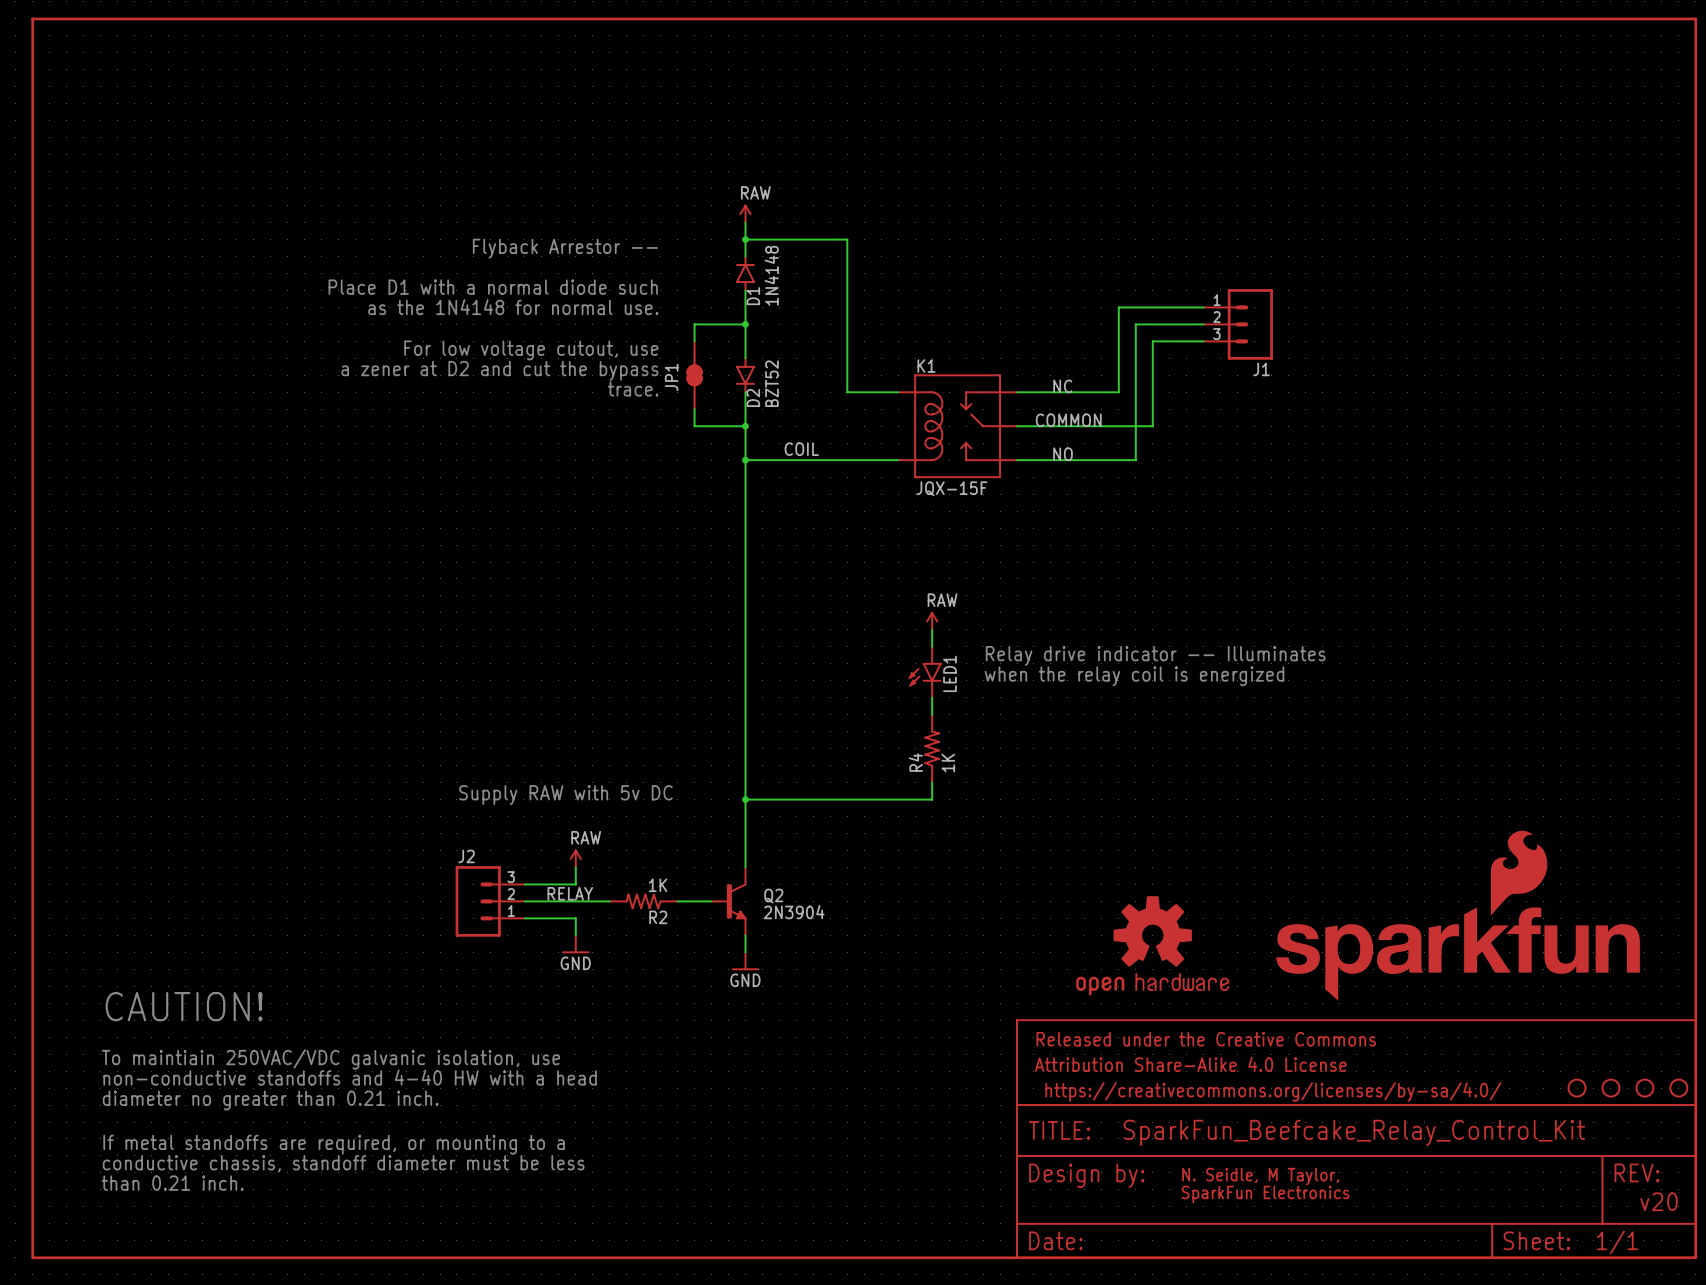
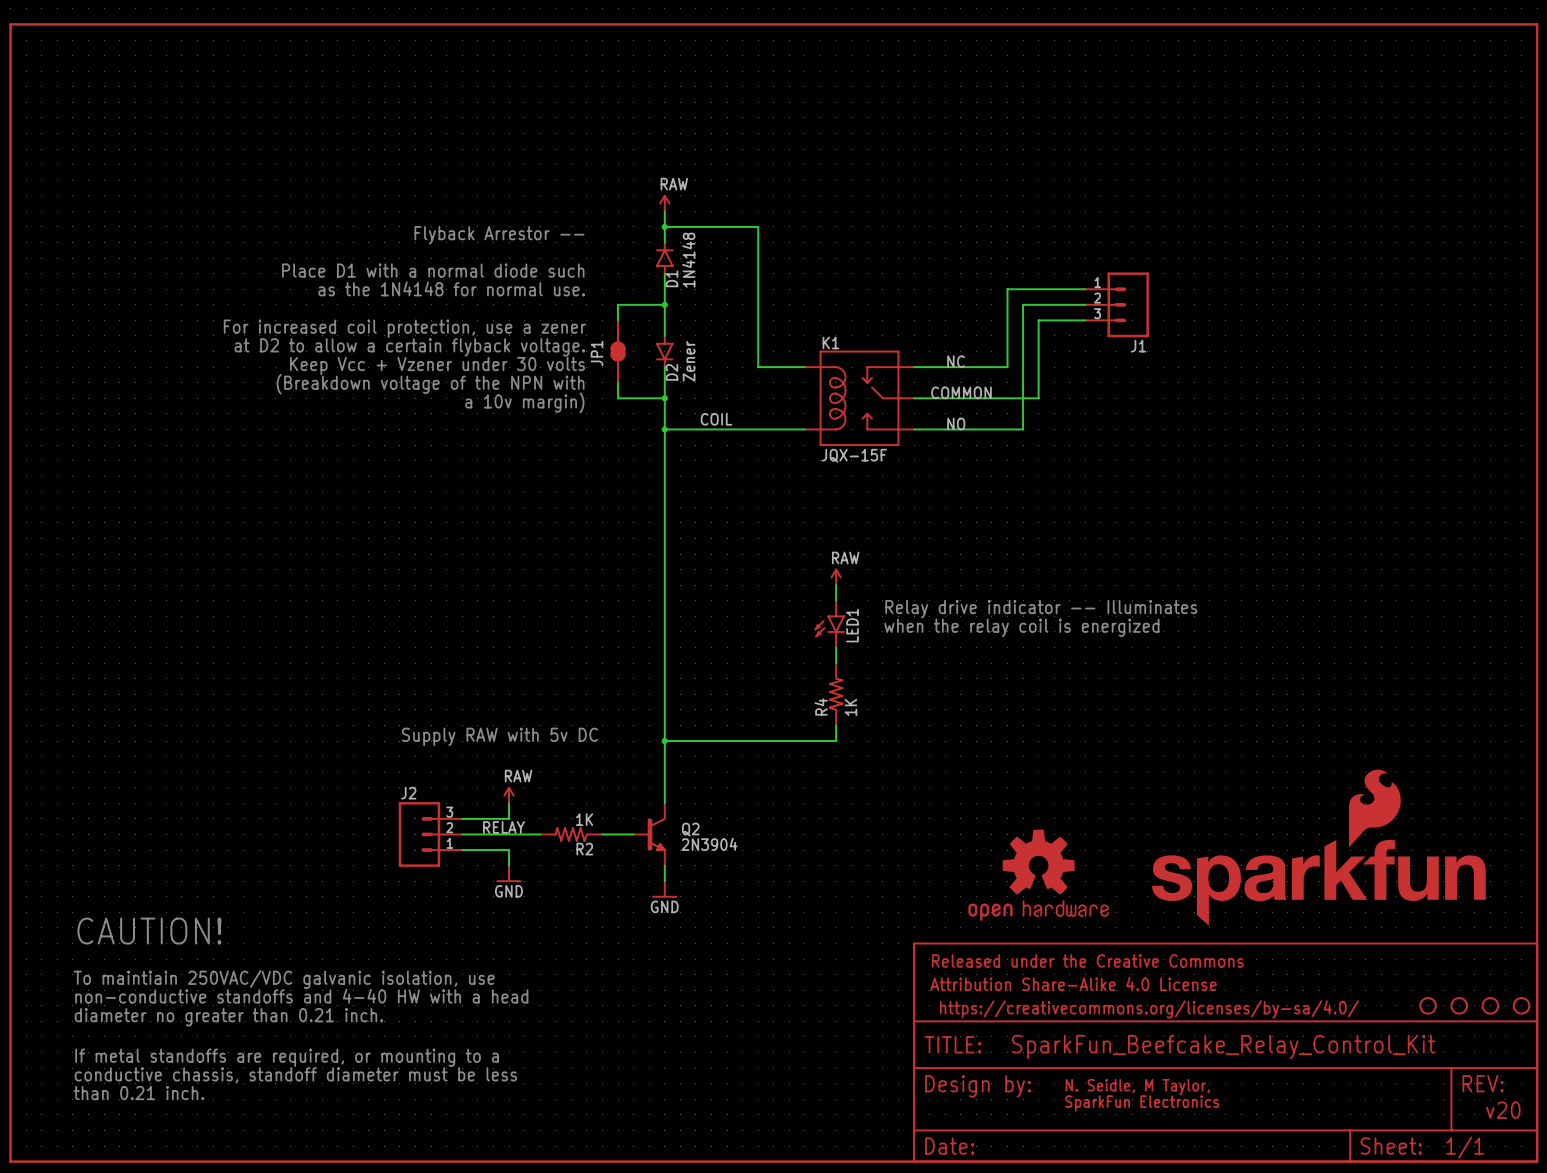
text: For low voltage cutout, use (531, 350) -> For increased coil protection, use a zener (404, 328)
text: a zener at D2 and cut the bypass (499, 370) -> at D2 to allow a certain flyback voltage. (409, 347)
D2 value: BZT52 (771, 383) -> Zener (689, 361)
text: trace. (633, 388) -> Keep Vcc + Vzener under 30 volts (437, 366)
text: none -> (Breakdown voltage of the NPN with (430, 384)
text: none -> a 10v margin) (524, 402)

